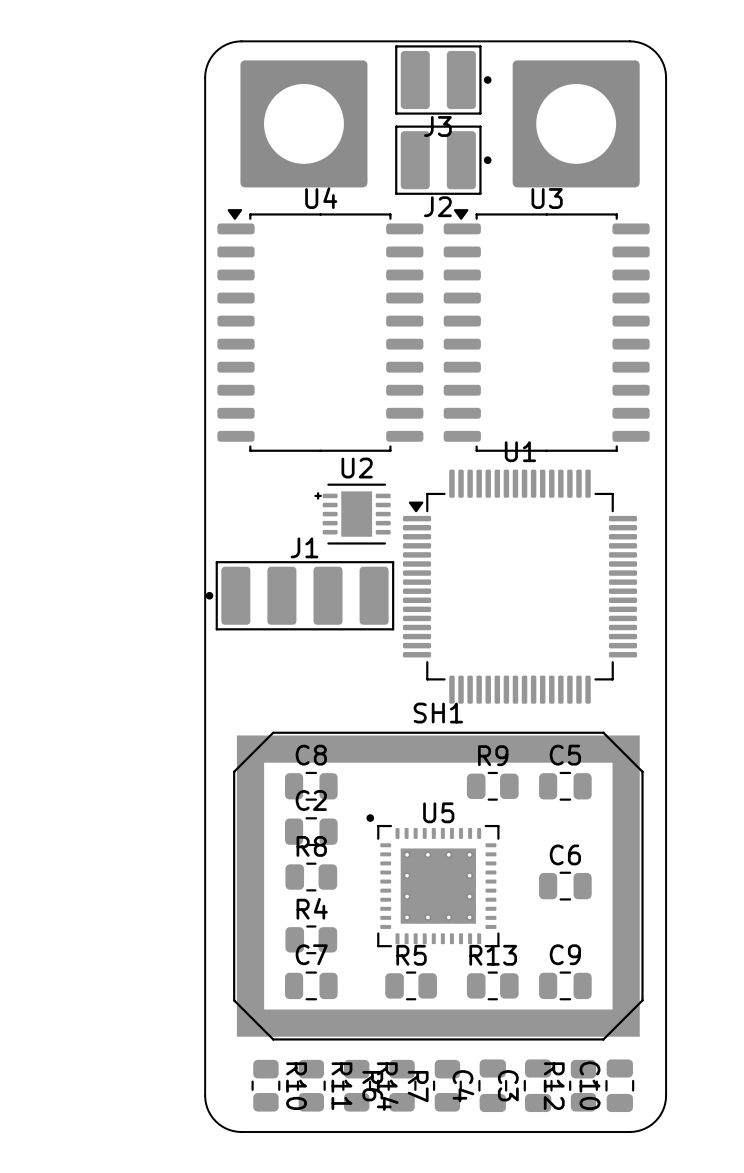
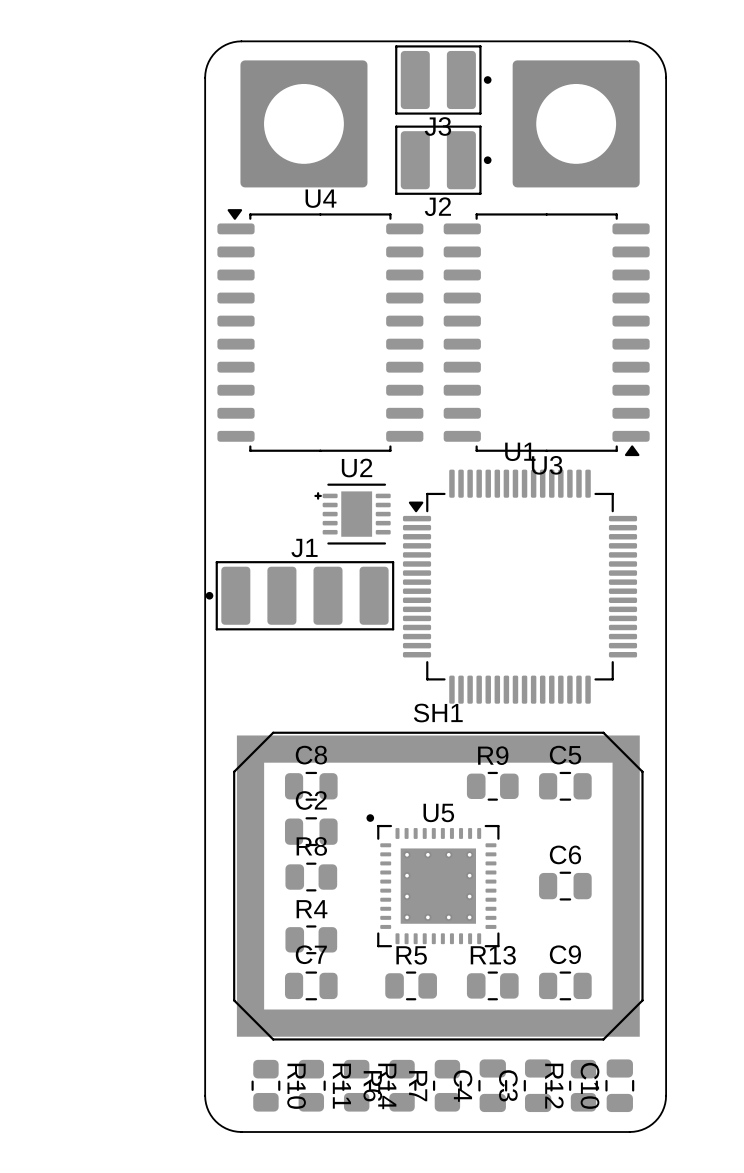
U3 rotation: 0° (546, 330) -> 180° (546, 334)

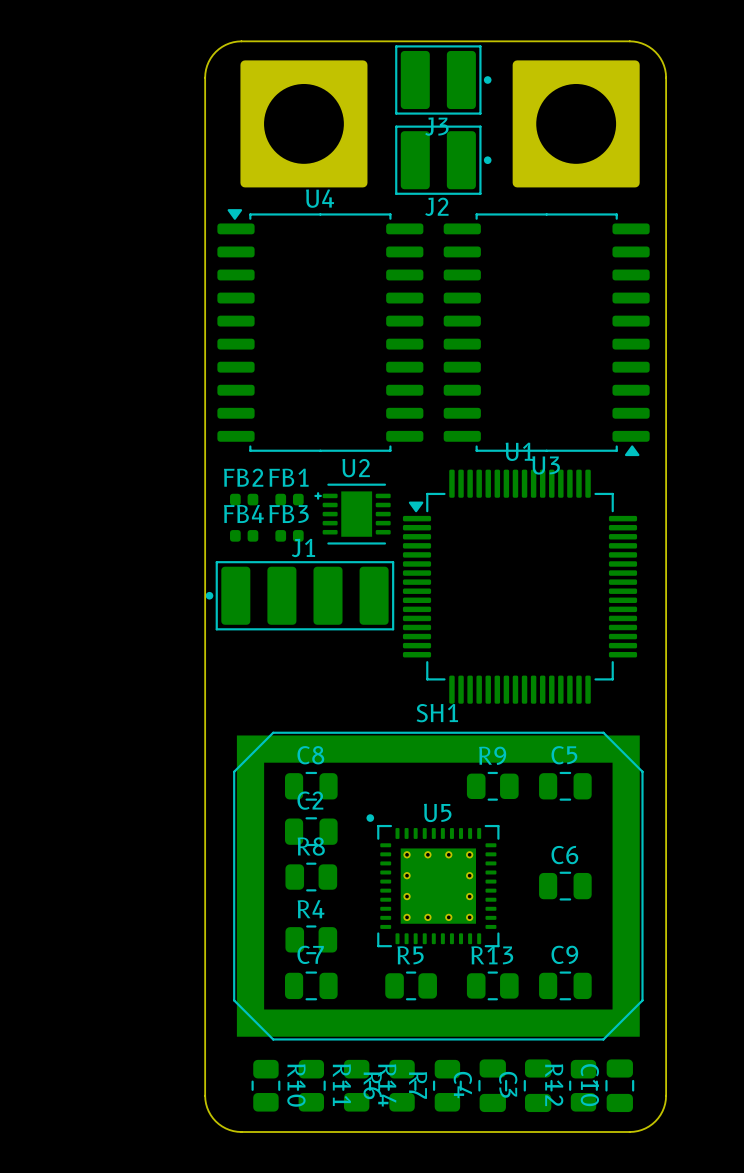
FB2: none -> (244, 499)
FB1: none -> (289, 499)
FB4: none -> (244, 535)
FB3: none -> (289, 535)

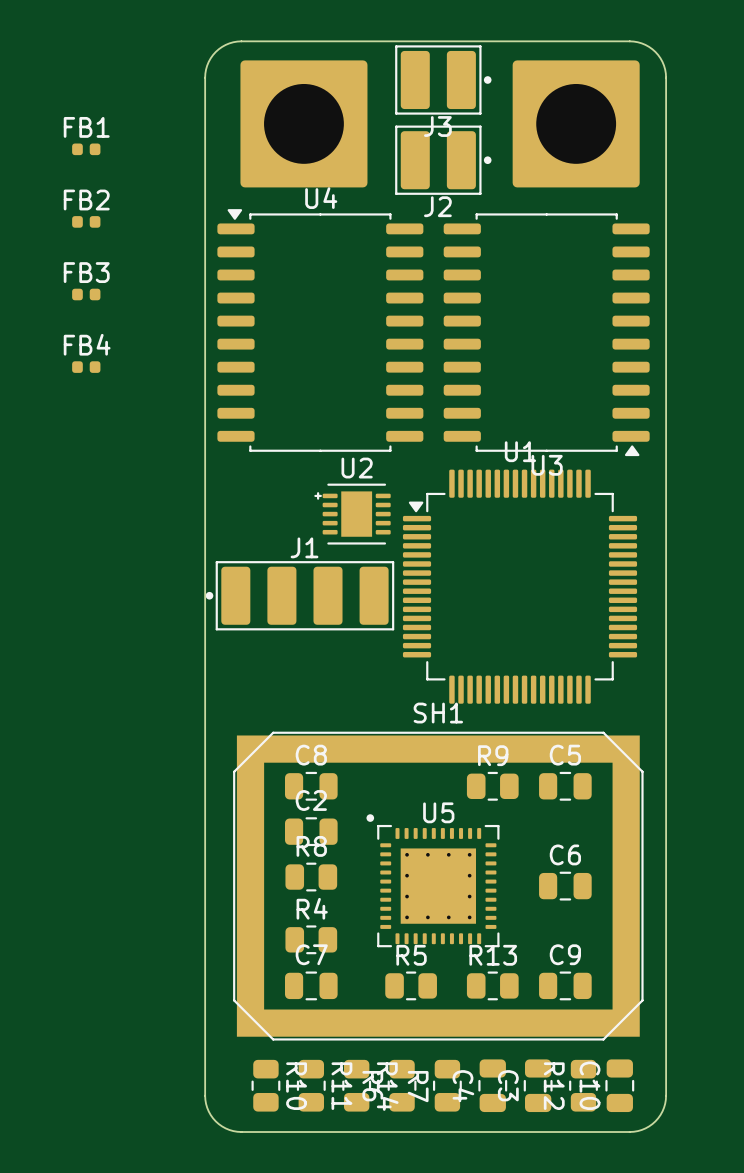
FB2 position: (244, 499) -> (86, 221)
FB1 position: (289, 499) -> (86, 149)
FB4 position: (244, 535) -> (86, 367)
FB3 position: (289, 535) -> (86, 294)

